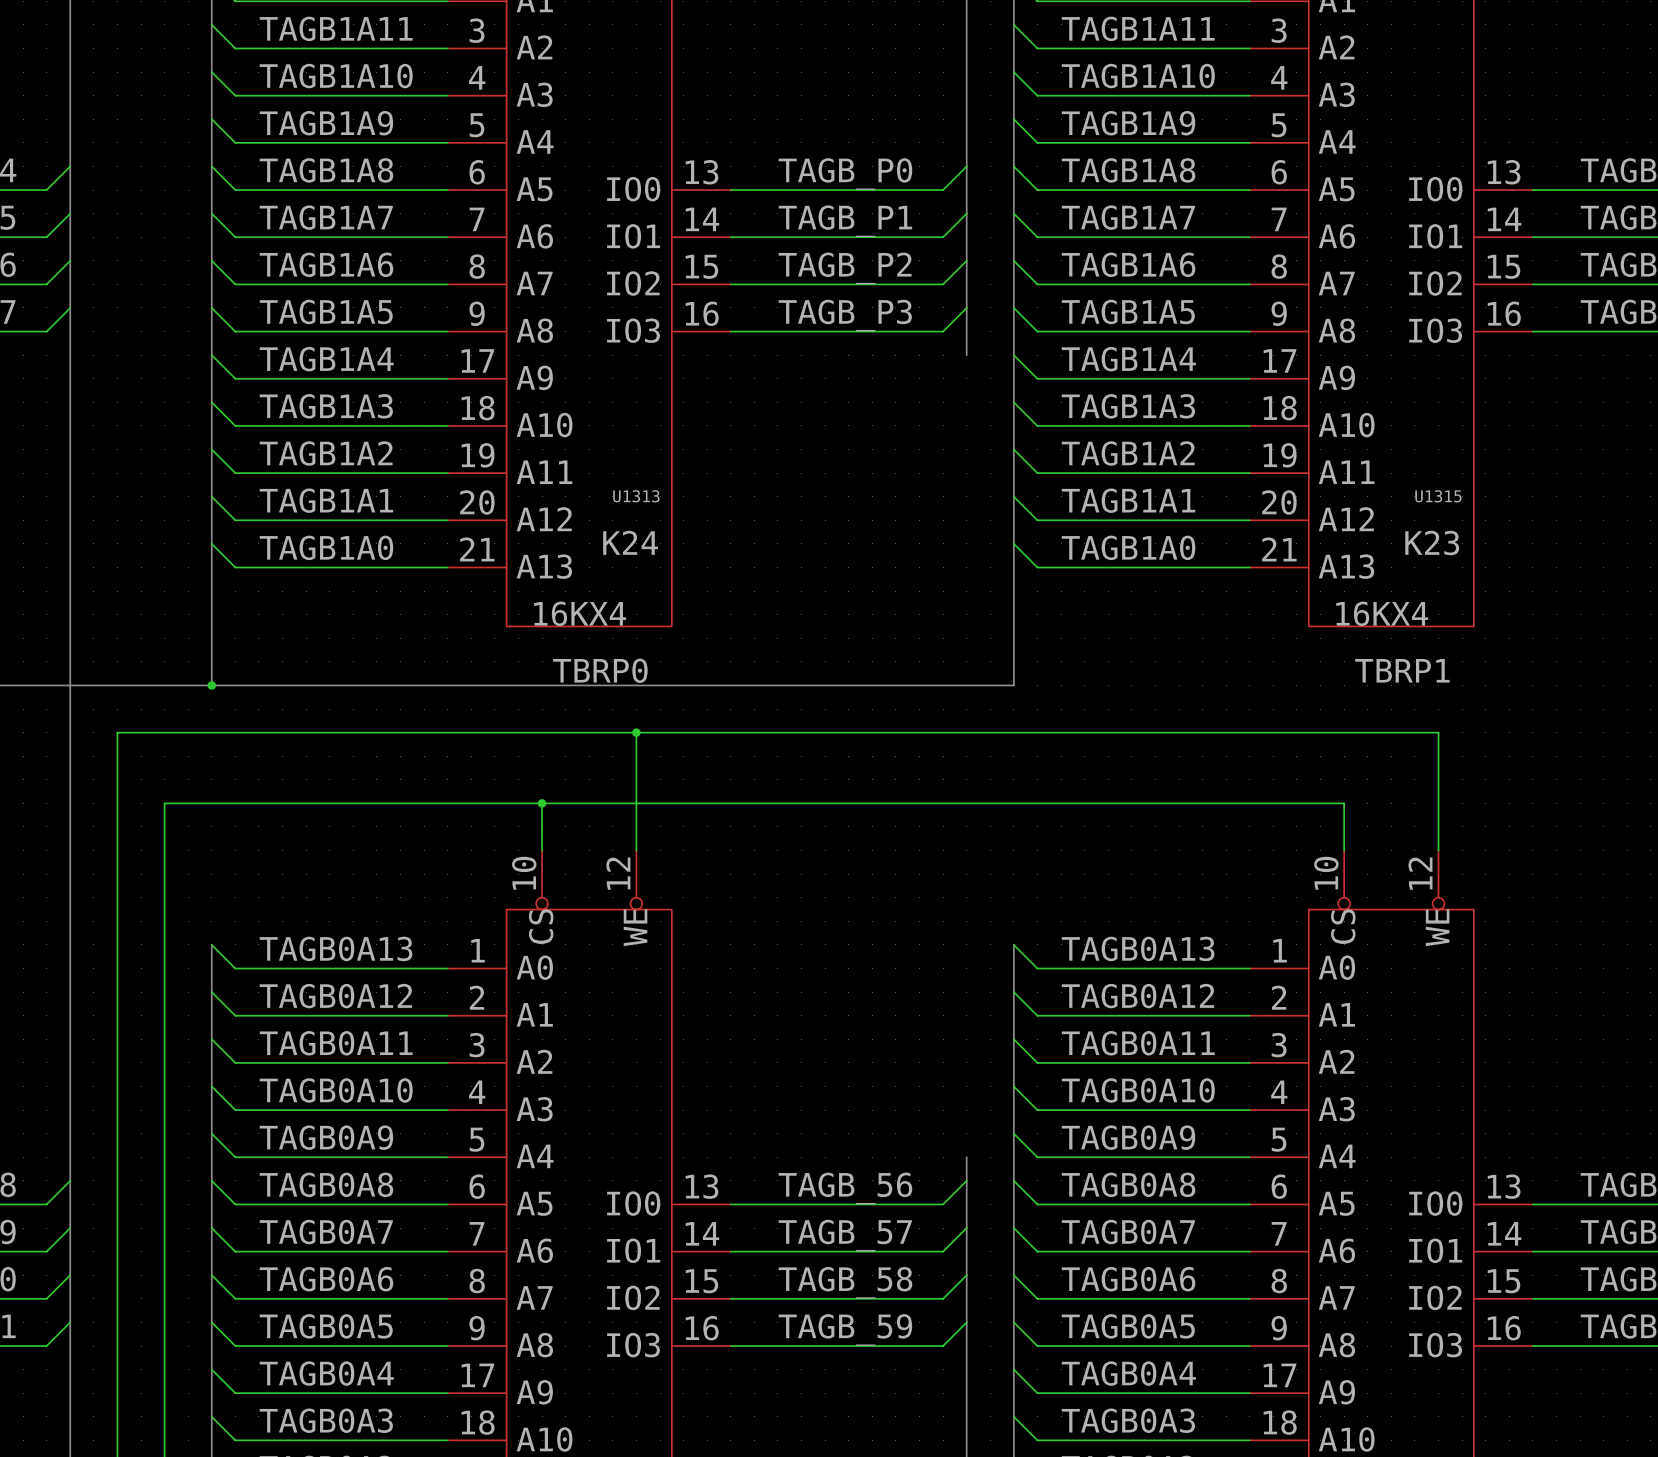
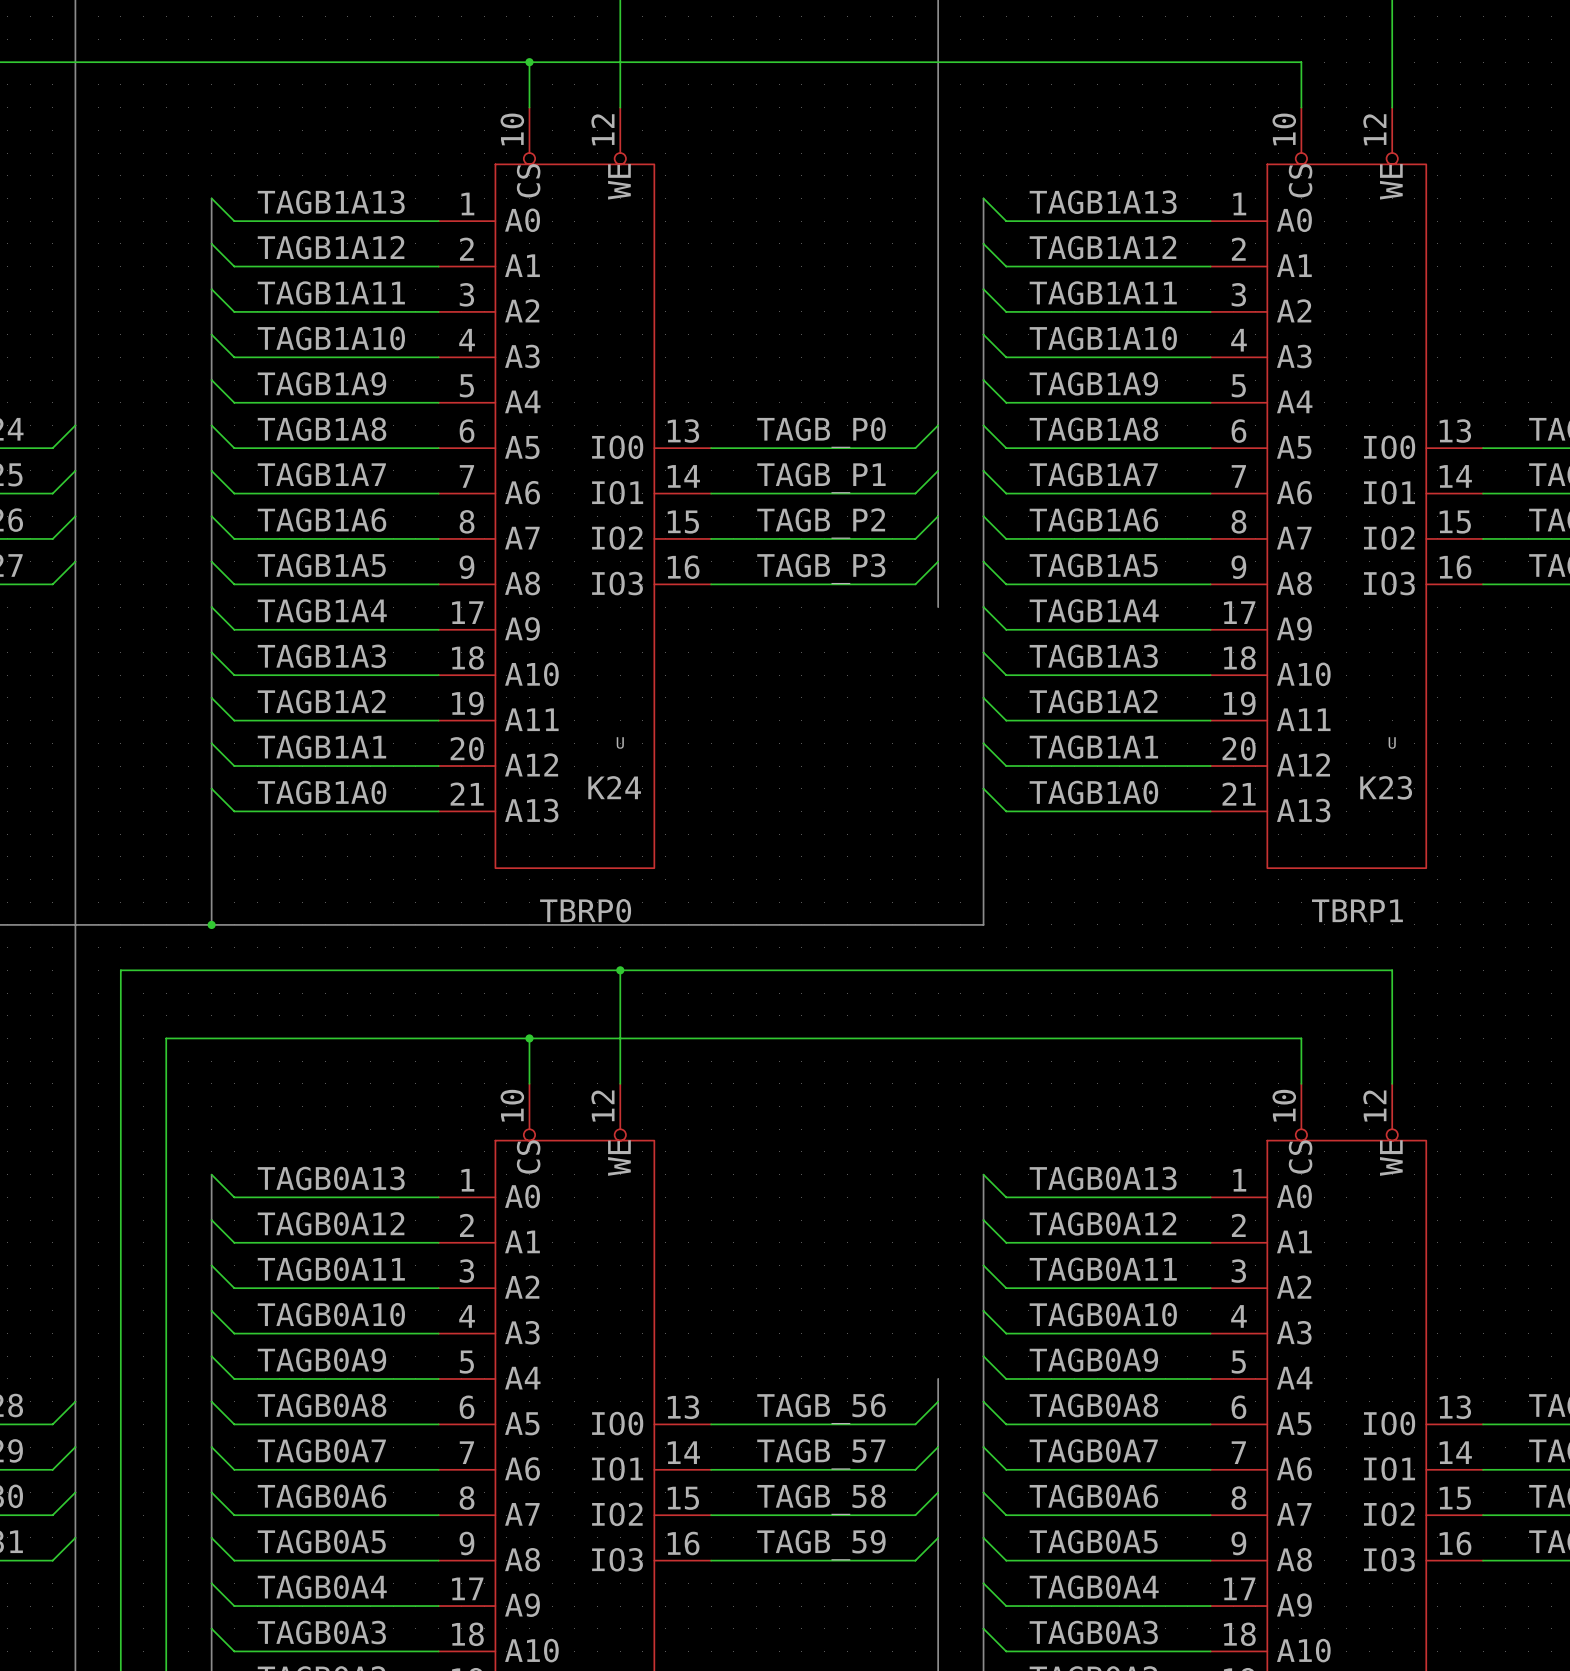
U1313 name: U1313 (636, 496) -> U (620, 742)
U1315 name: U1315 (1438, 496) -> U (1392, 742)
U1313 value: 16KX4 (580, 613) -> none
U1315 value: 16KX4 (1382, 613) -> none

